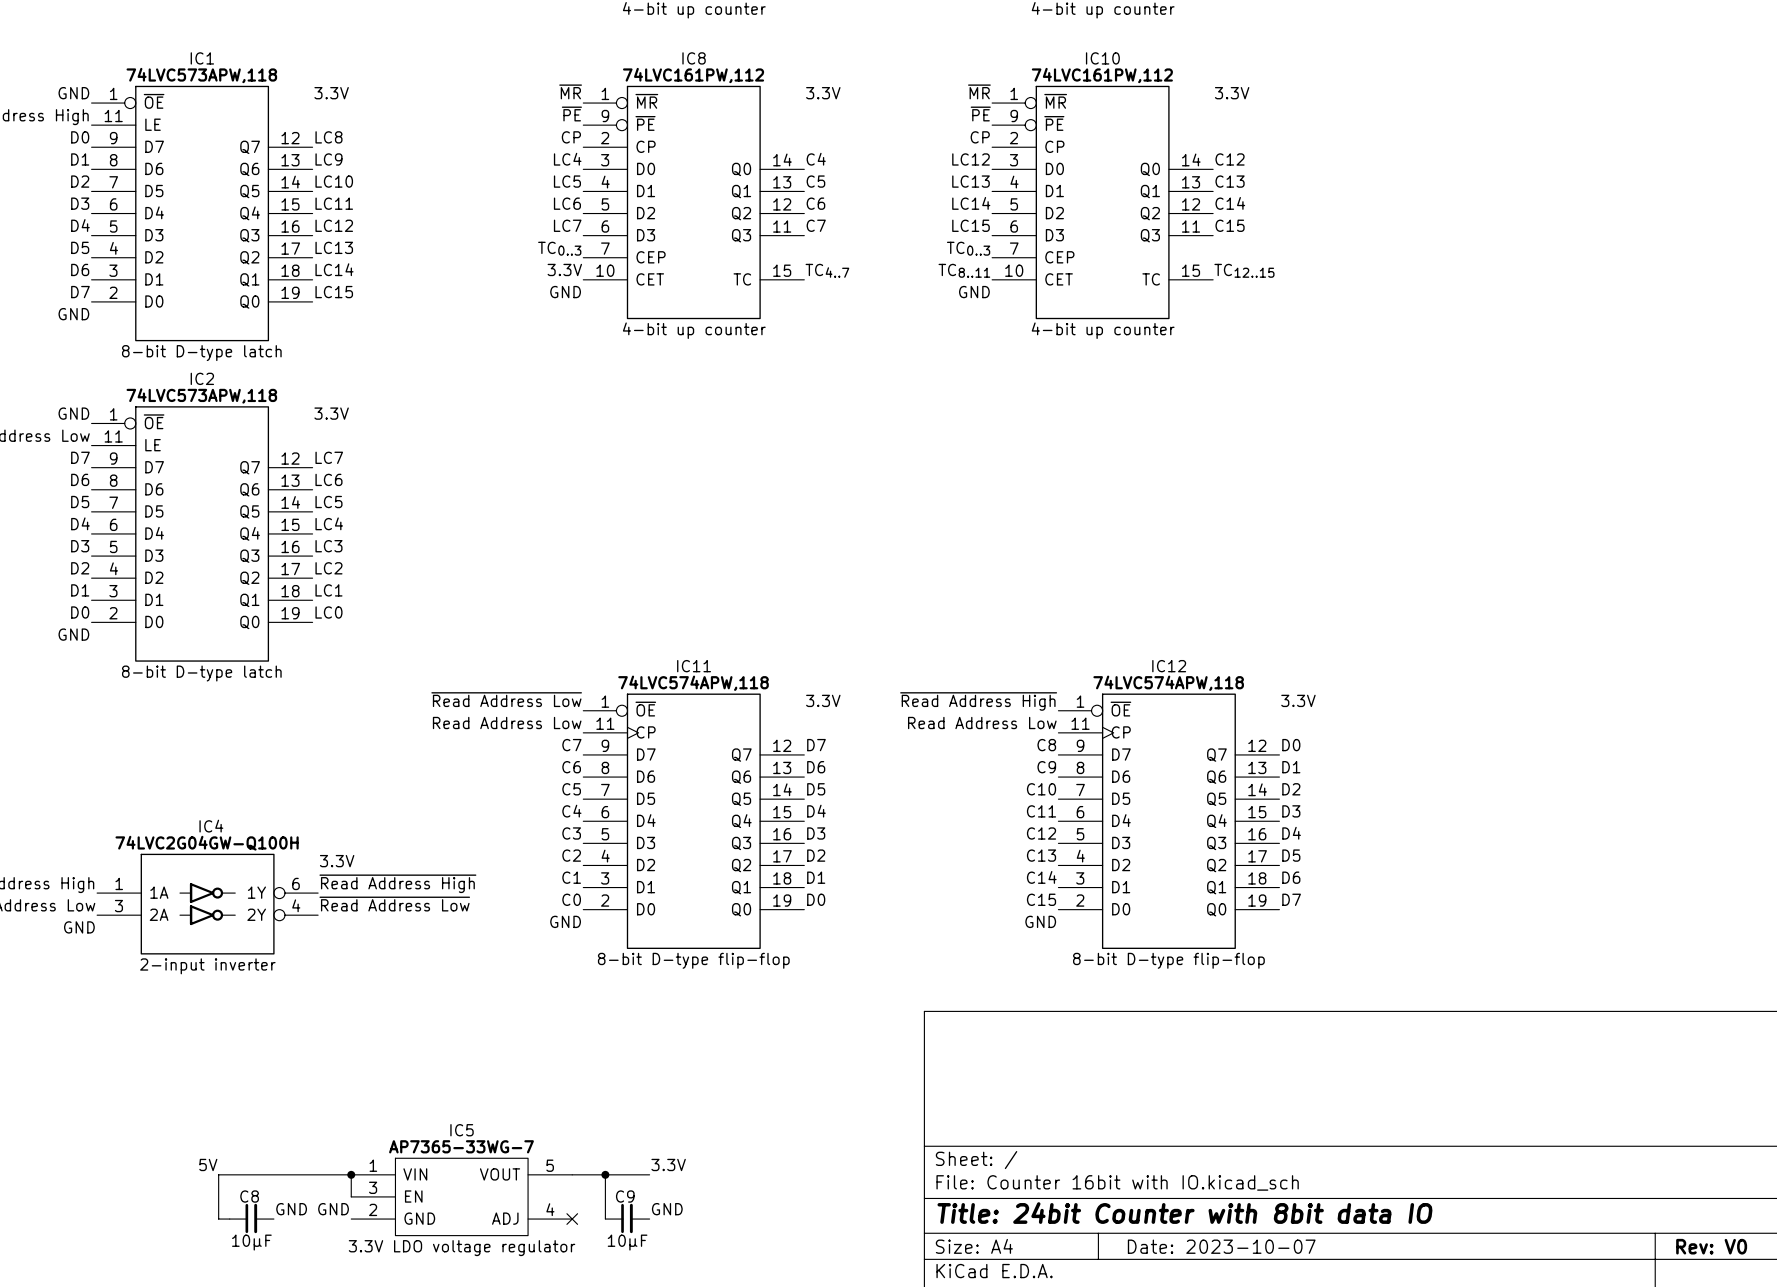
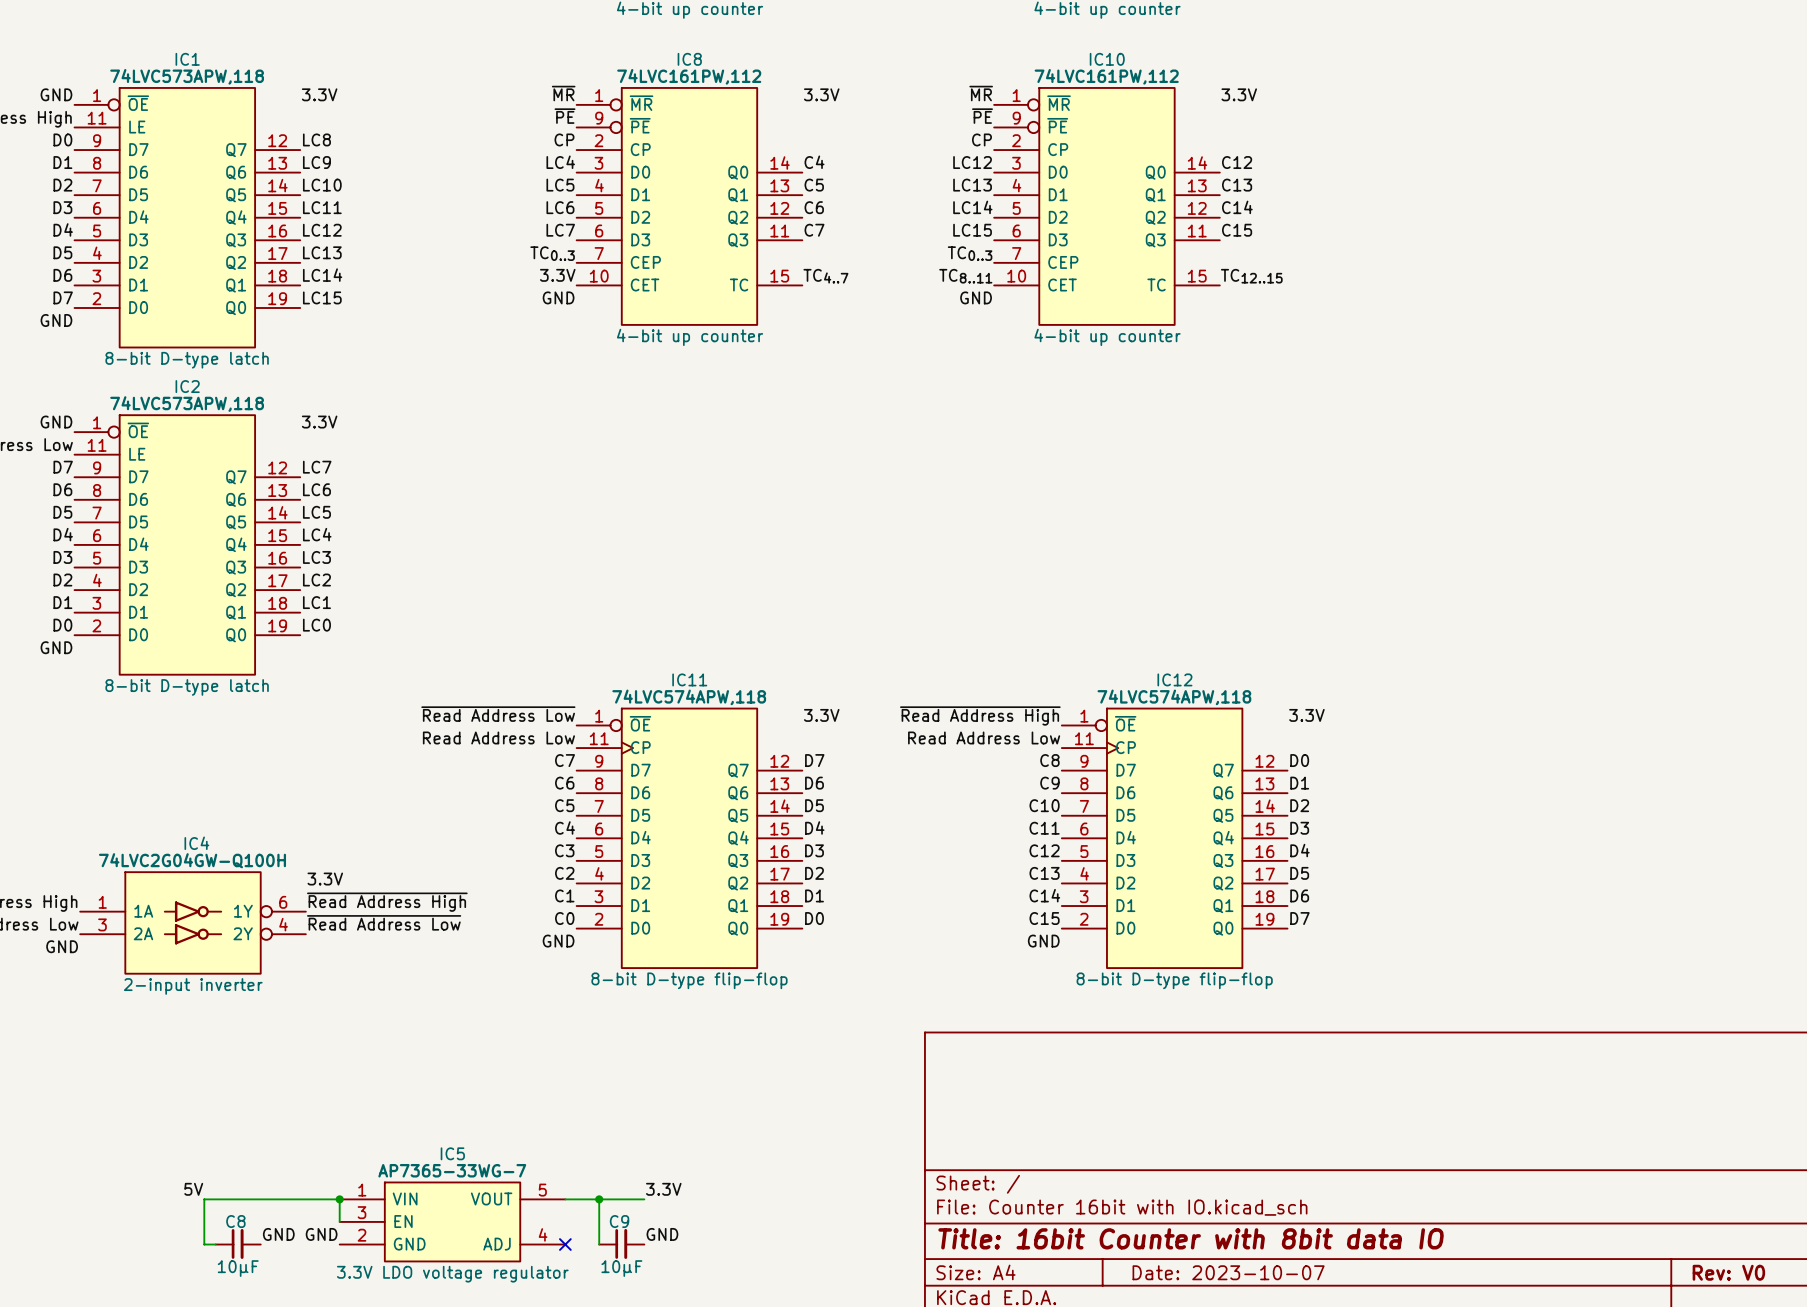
title block: Title: 24bit Counter with 8bit data IO (1184, 1213) -> Title: 16bit Counter with 8bit data IO (1191, 1238)

